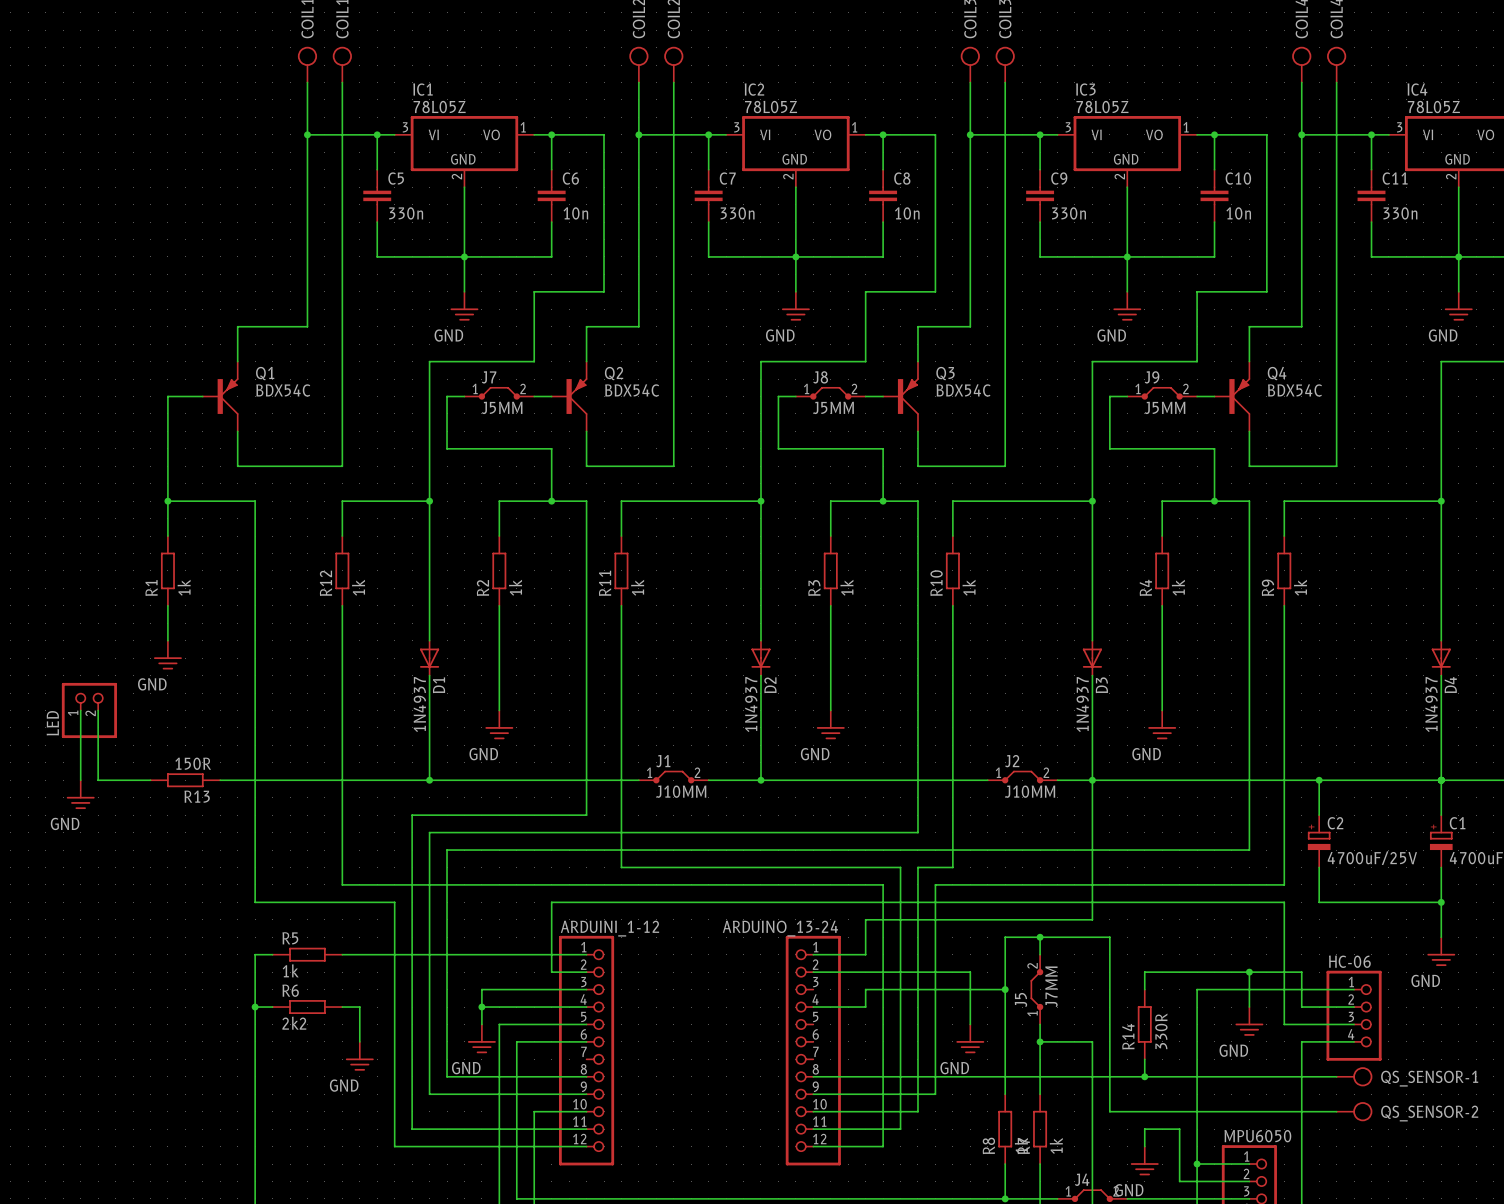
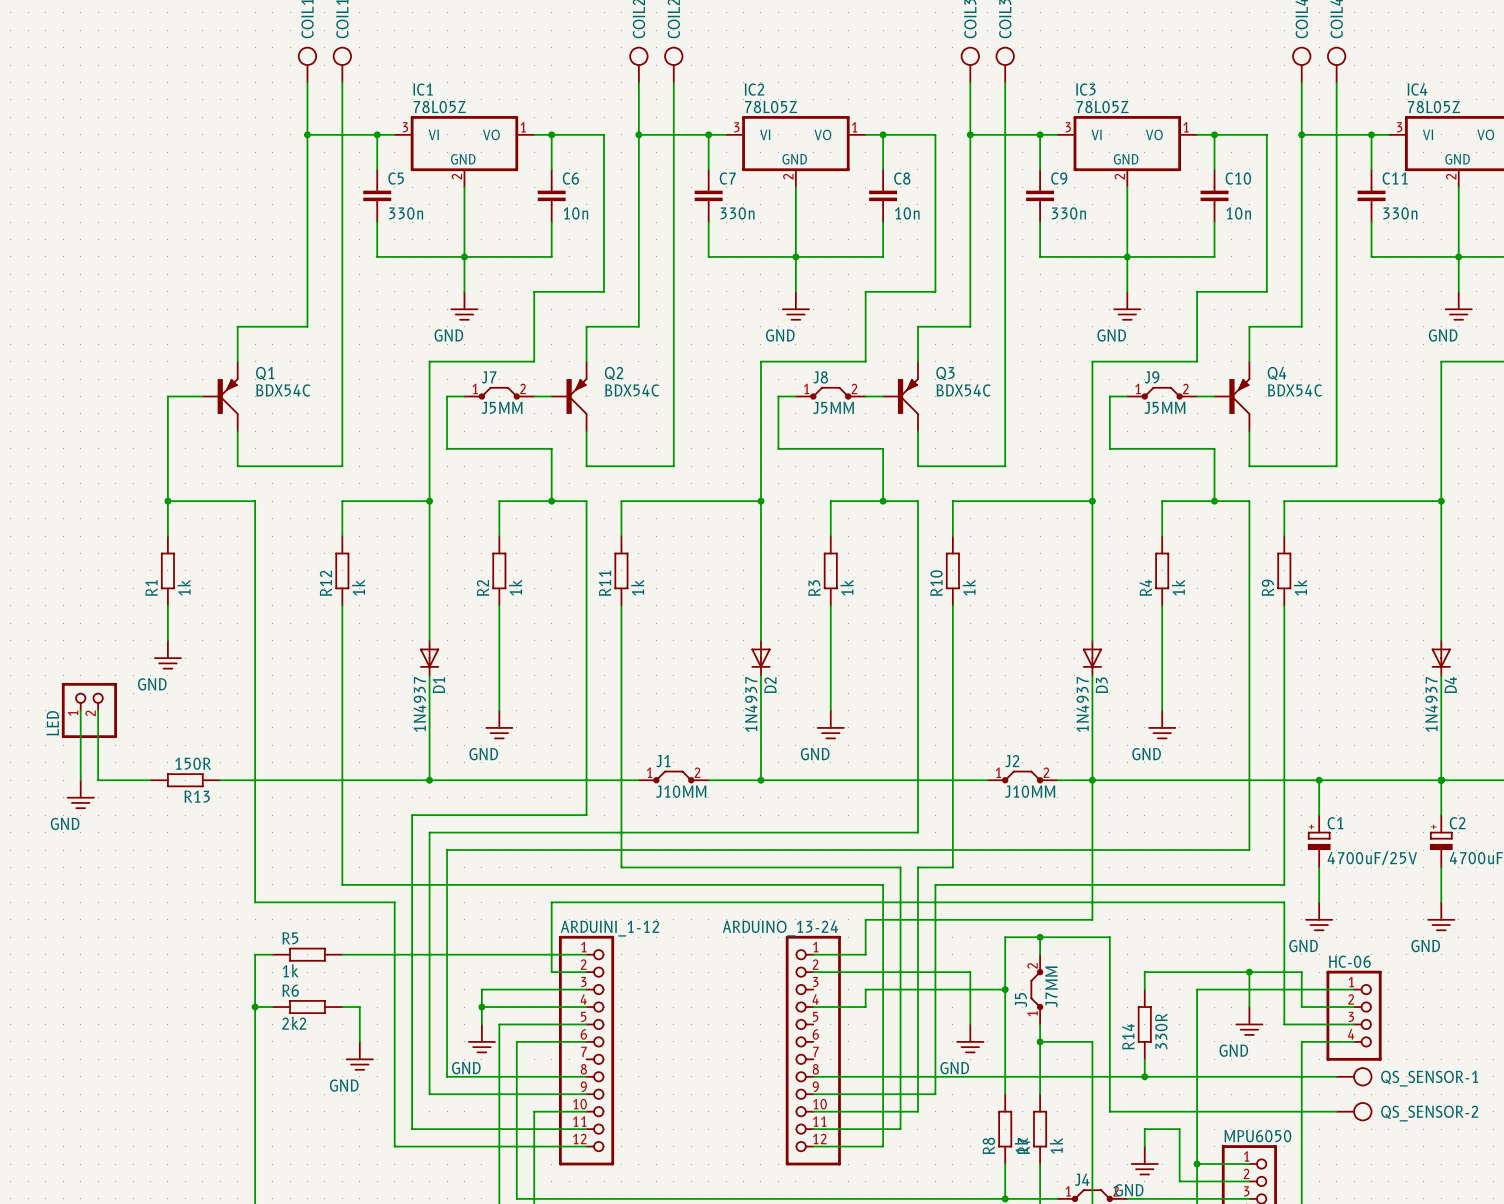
C2 name: C2 (1335, 823) -> C1 (1335, 823)
C1 name: C1 (1457, 823) -> C2 (1457, 823)
wire: (1319, 902) (1441, 902) (1441, 937) -> none
junction: (1441, 902) -> none
power symbol: none -> GND (1319, 916)
power symbol position: GND (1441, 951) -> GND (1441, 916)

